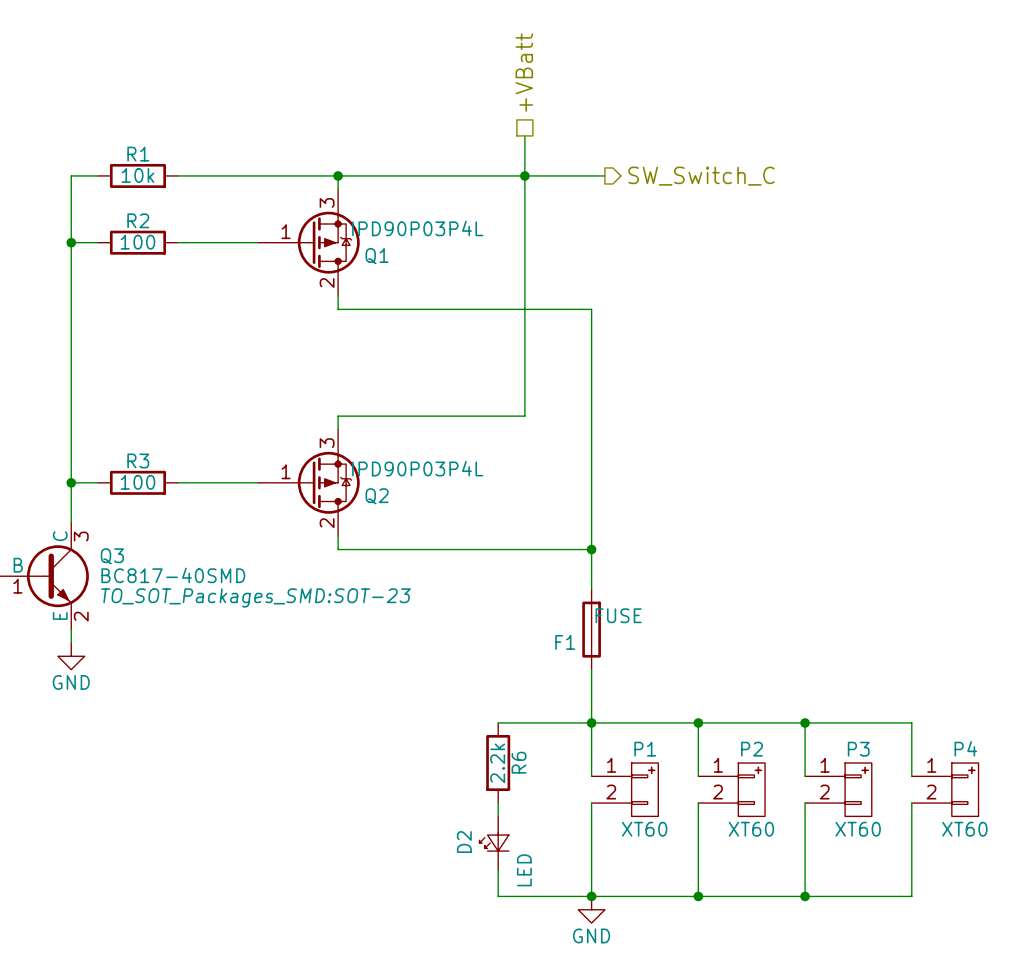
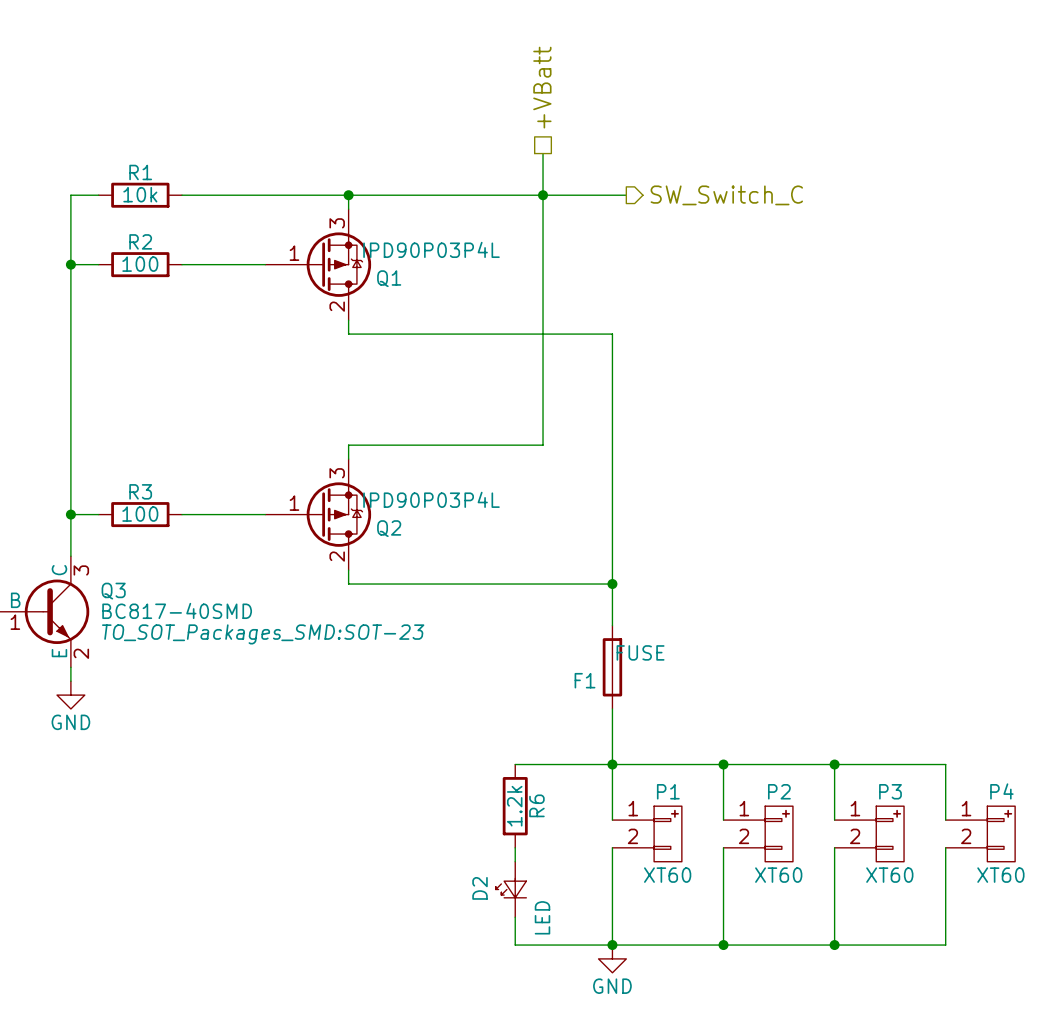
R6 value: 2.2k (497, 763) -> 1.2k (514, 806)

